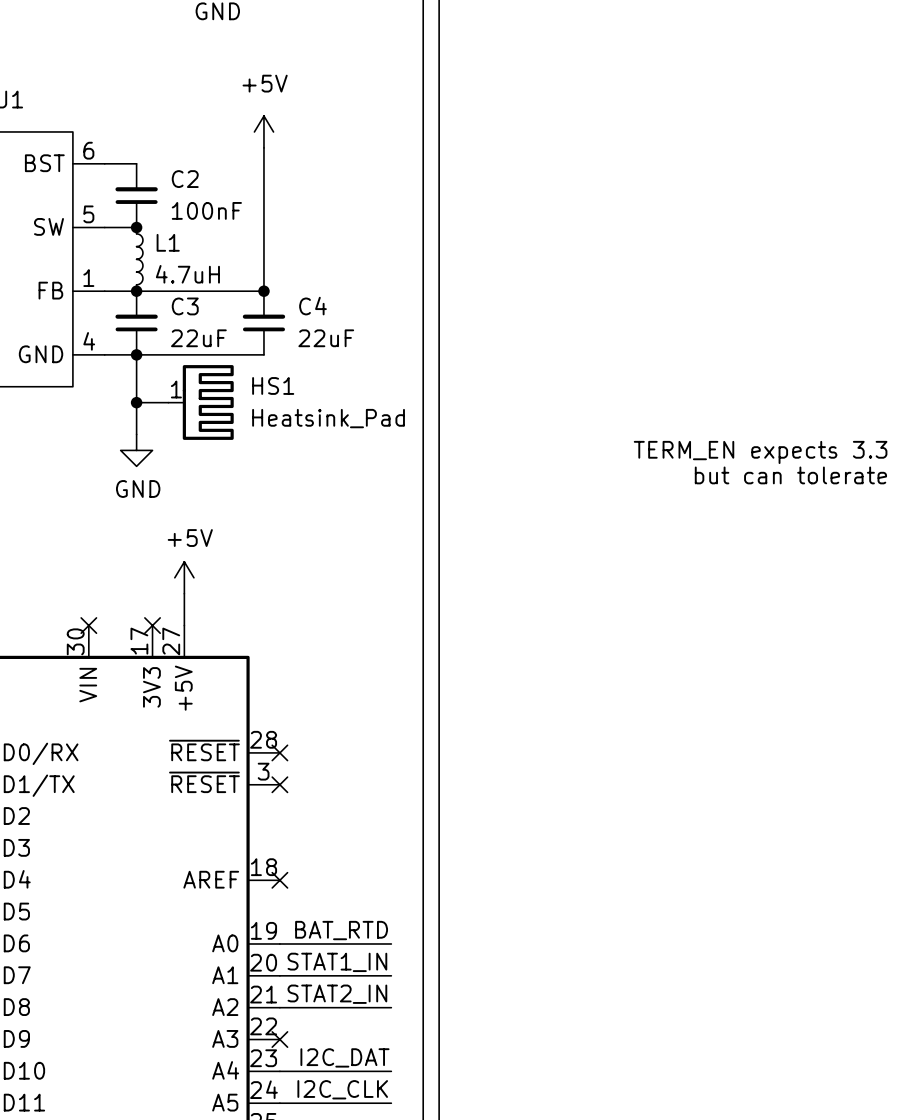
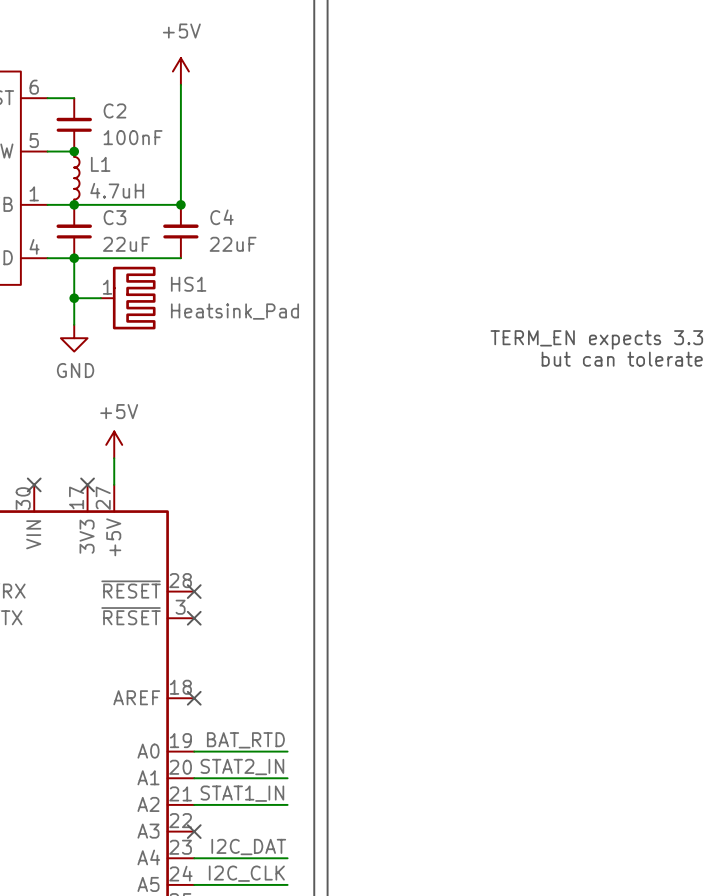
label: STAT1_IN (337, 962) -> STAT2_IN (242, 767)
label: STAT2_IN (337, 994) -> STAT1_IN (242, 793)

